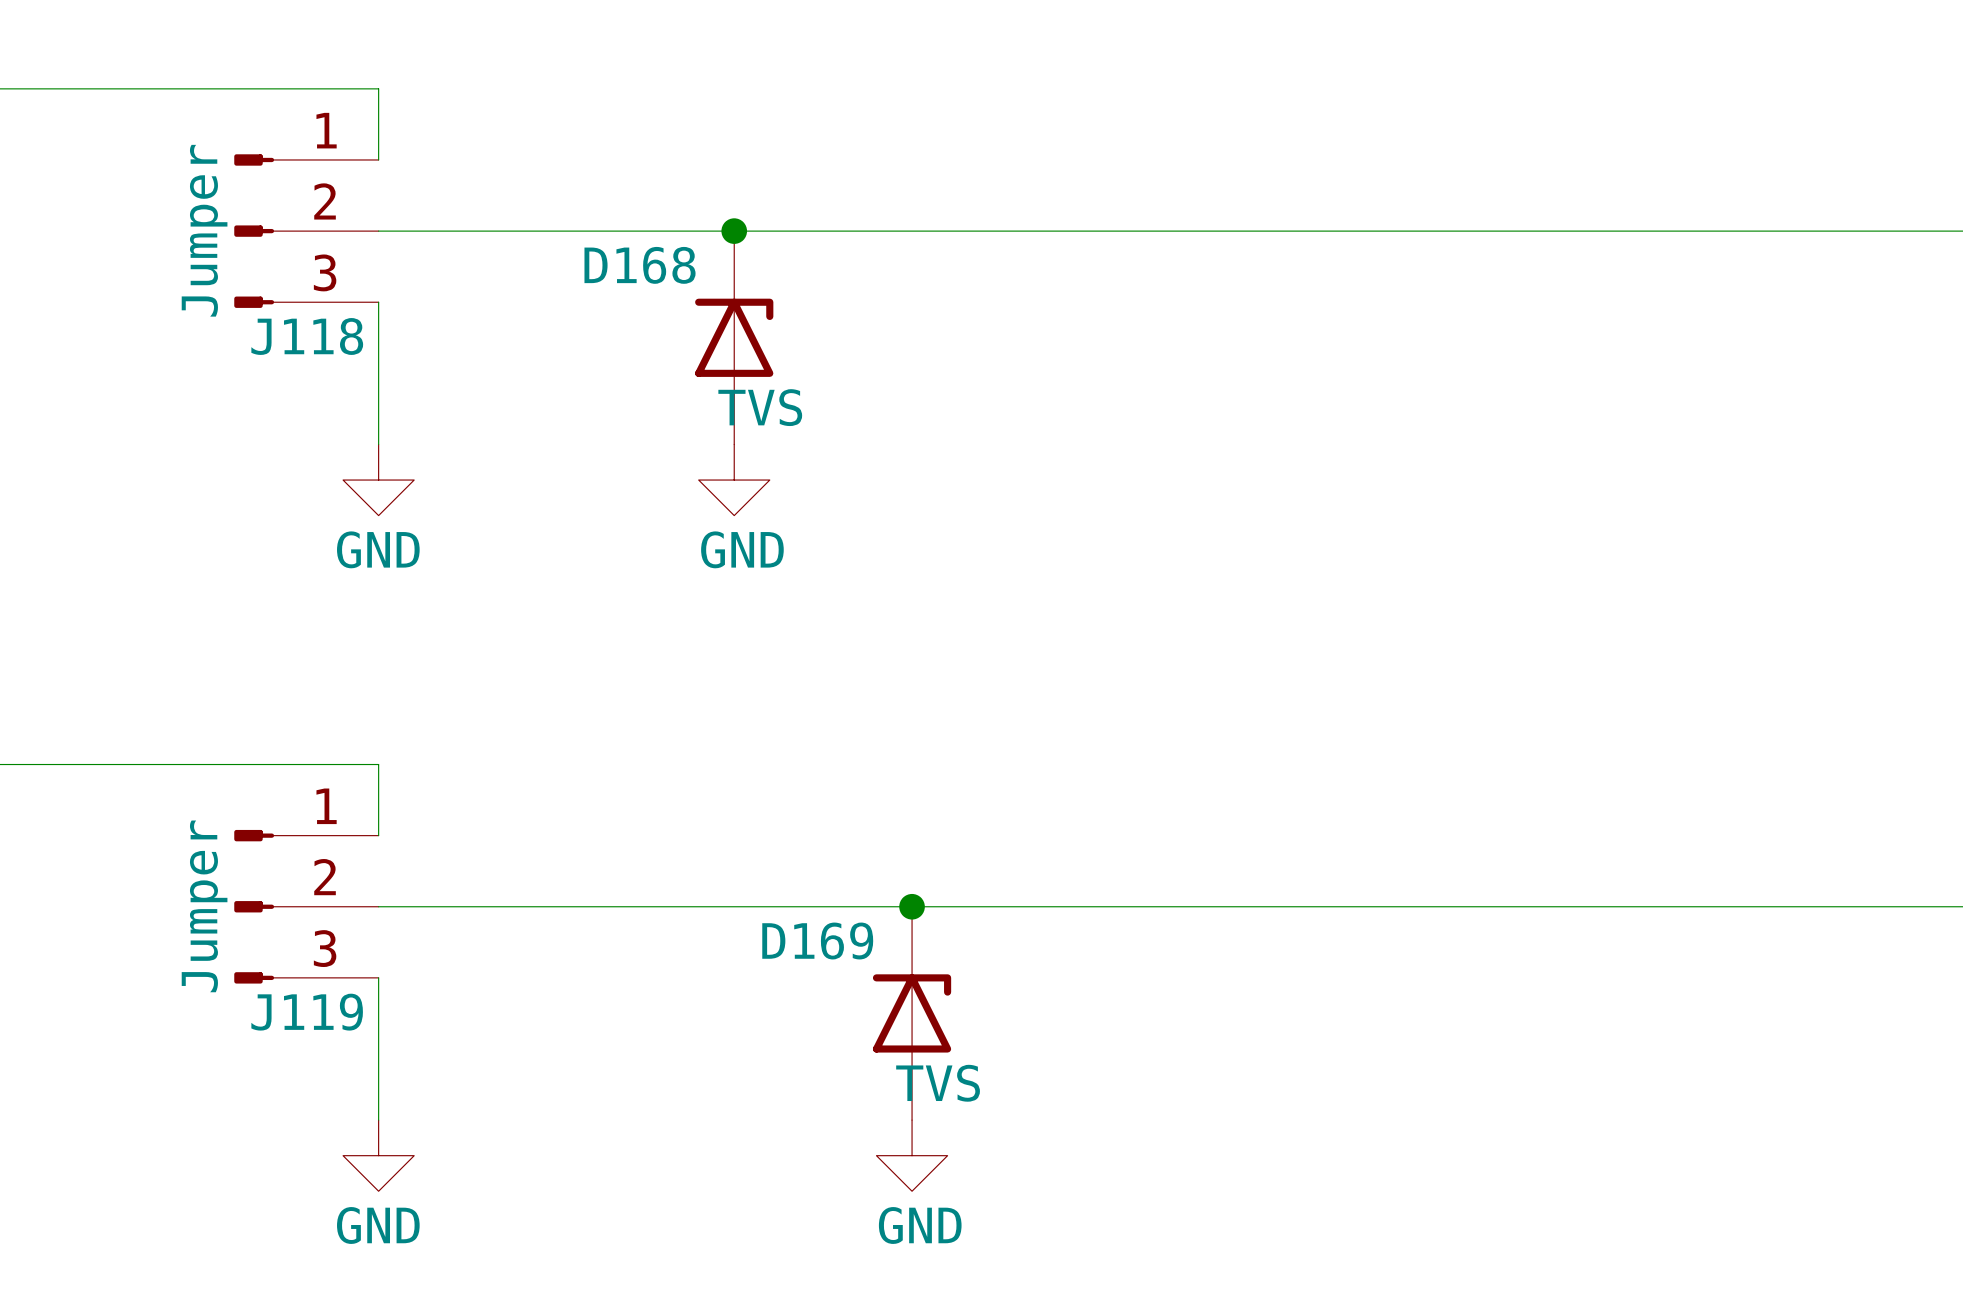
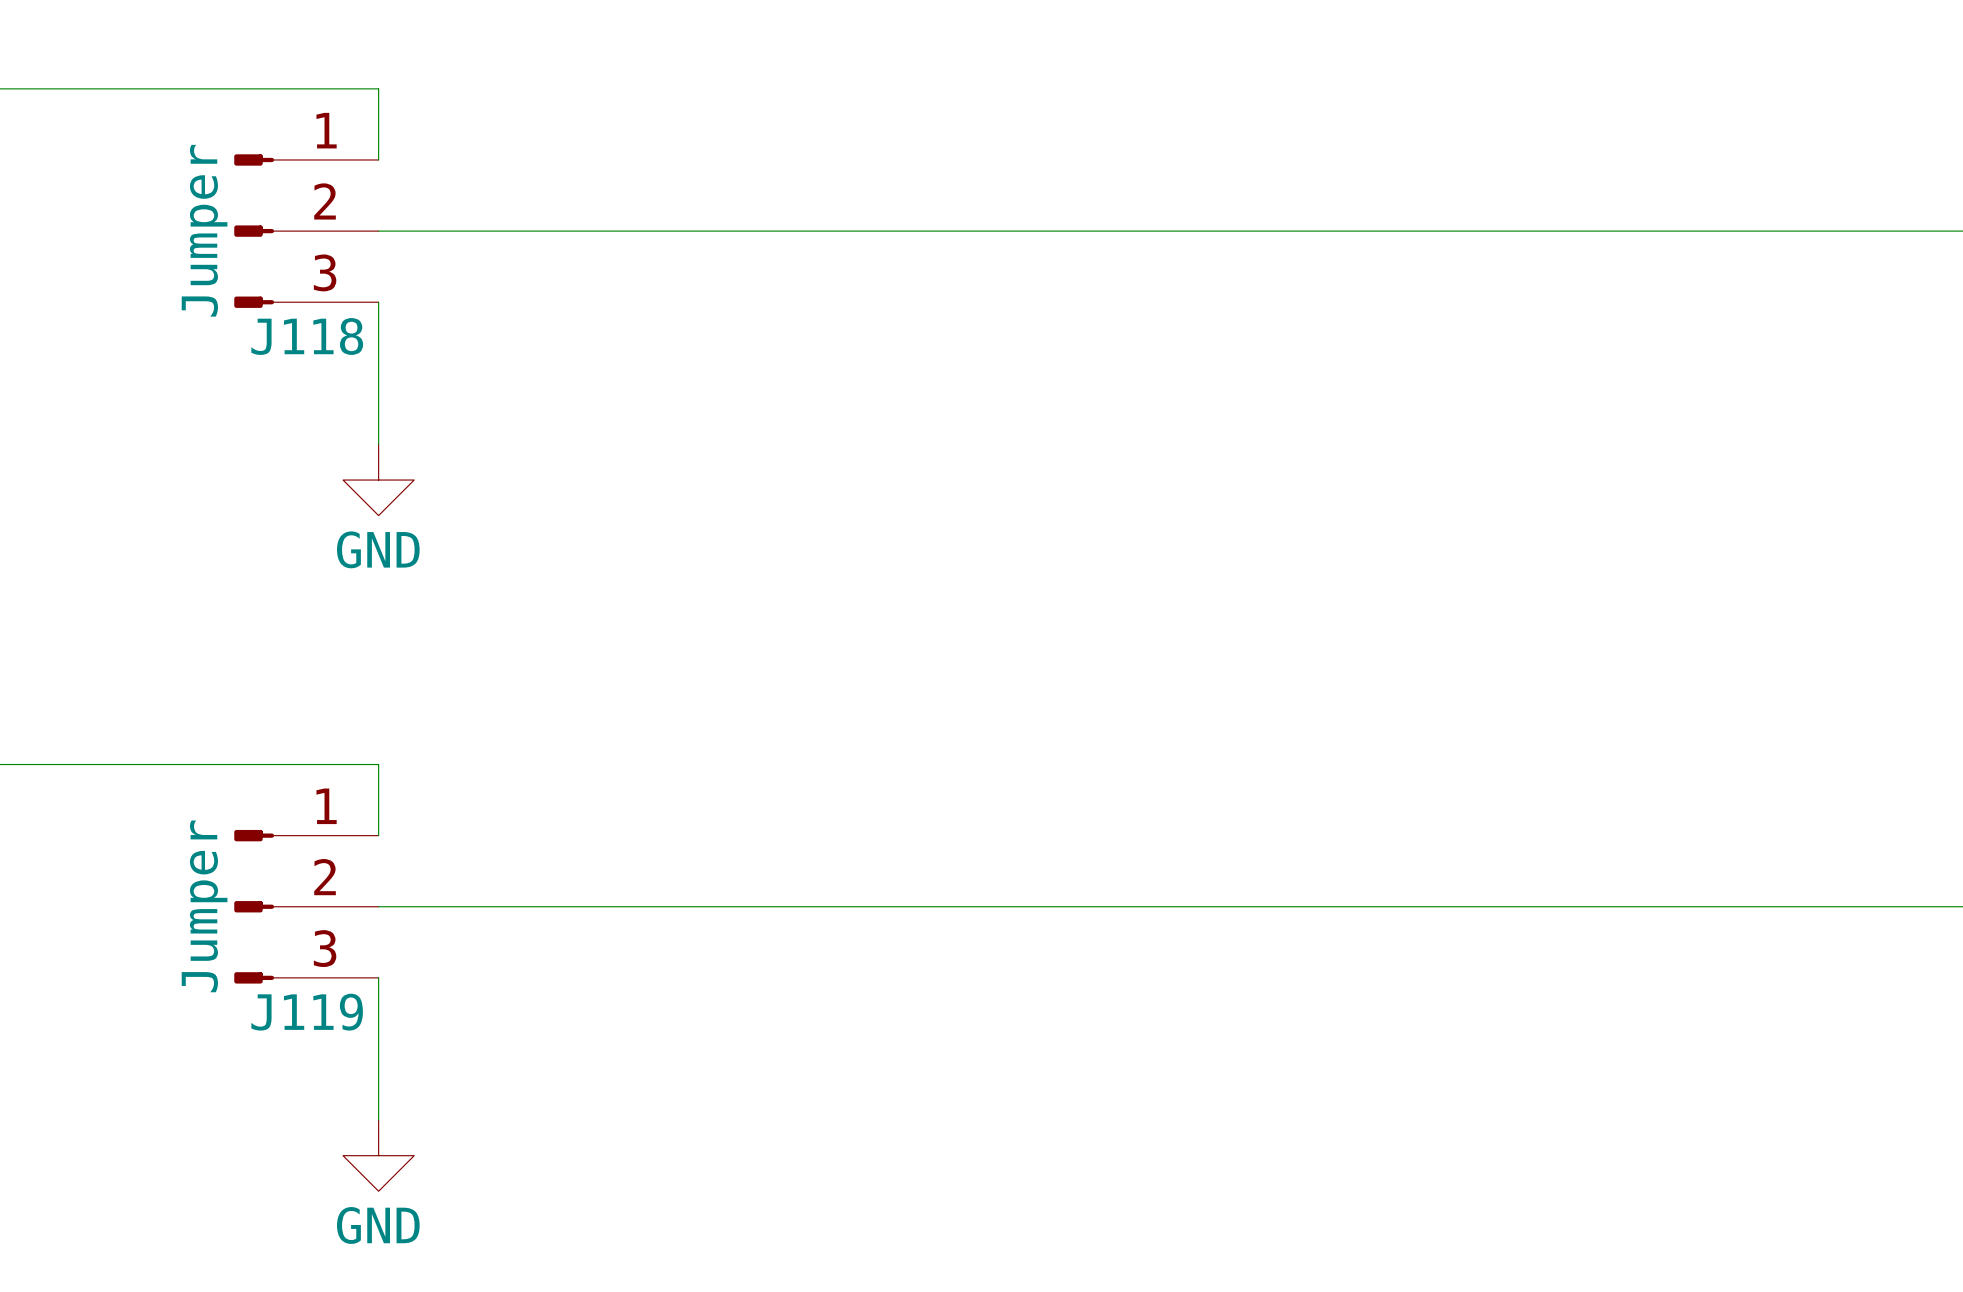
junction: (734, 231) -> none
D168: TVS (734, 337) -> none
power symbol: GND (734, 480) -> none
junction: (912, 906) -> none
D169: TVS (912, 1013) -> none
power symbol: GND (912, 1155) -> none

